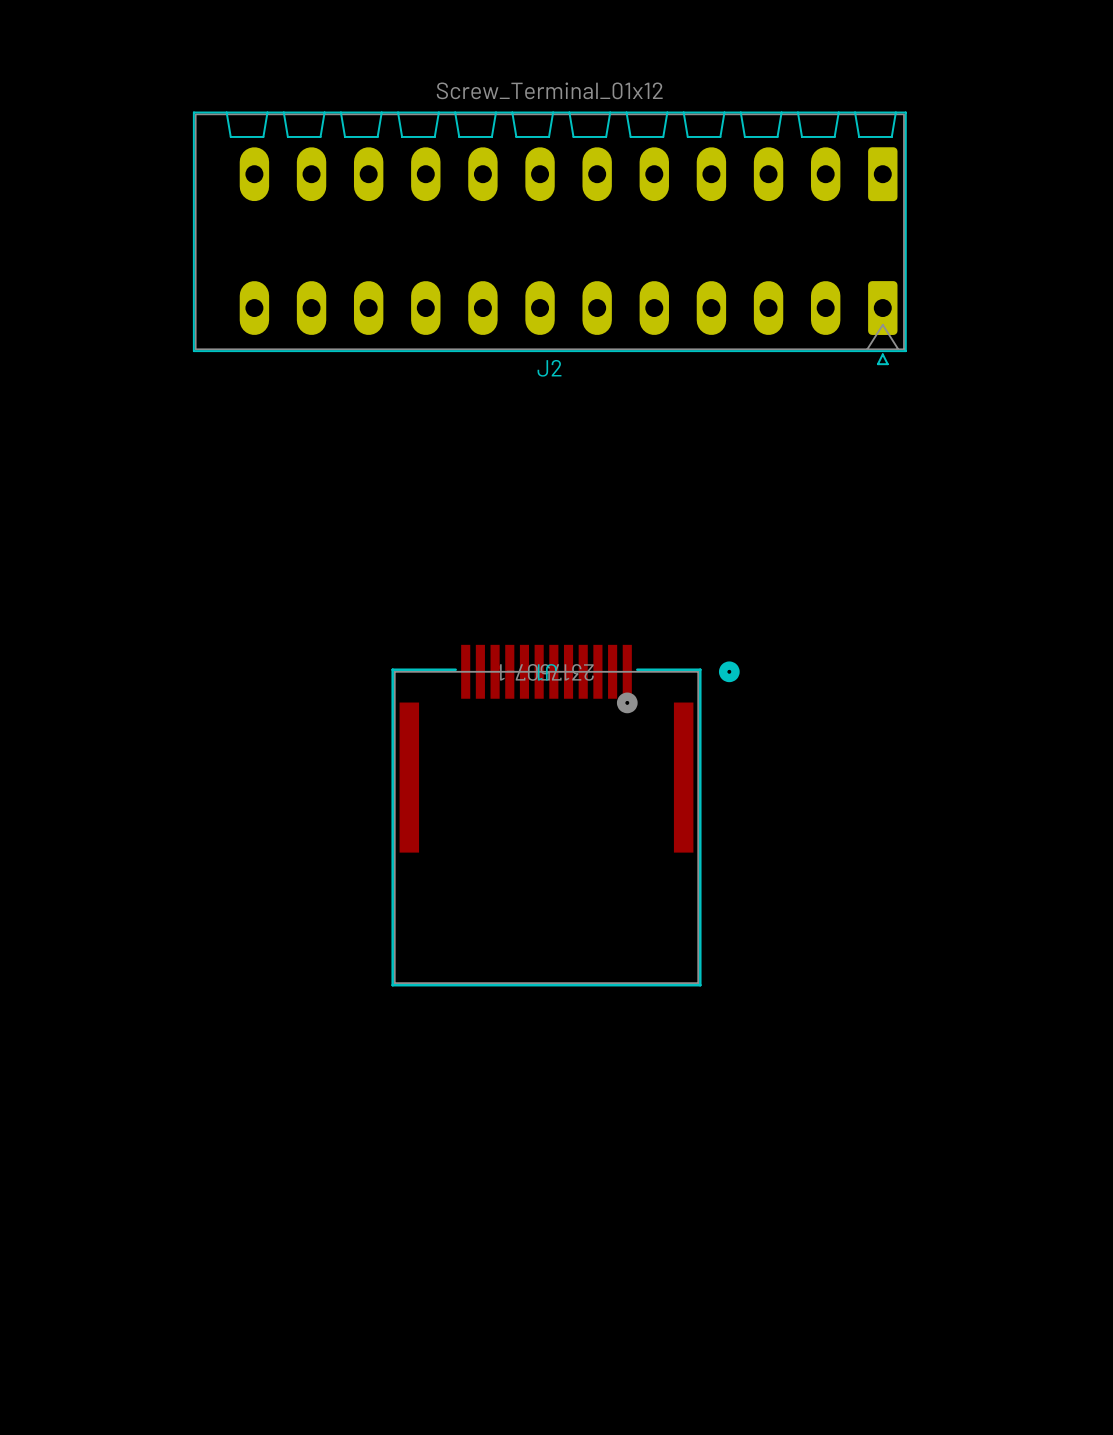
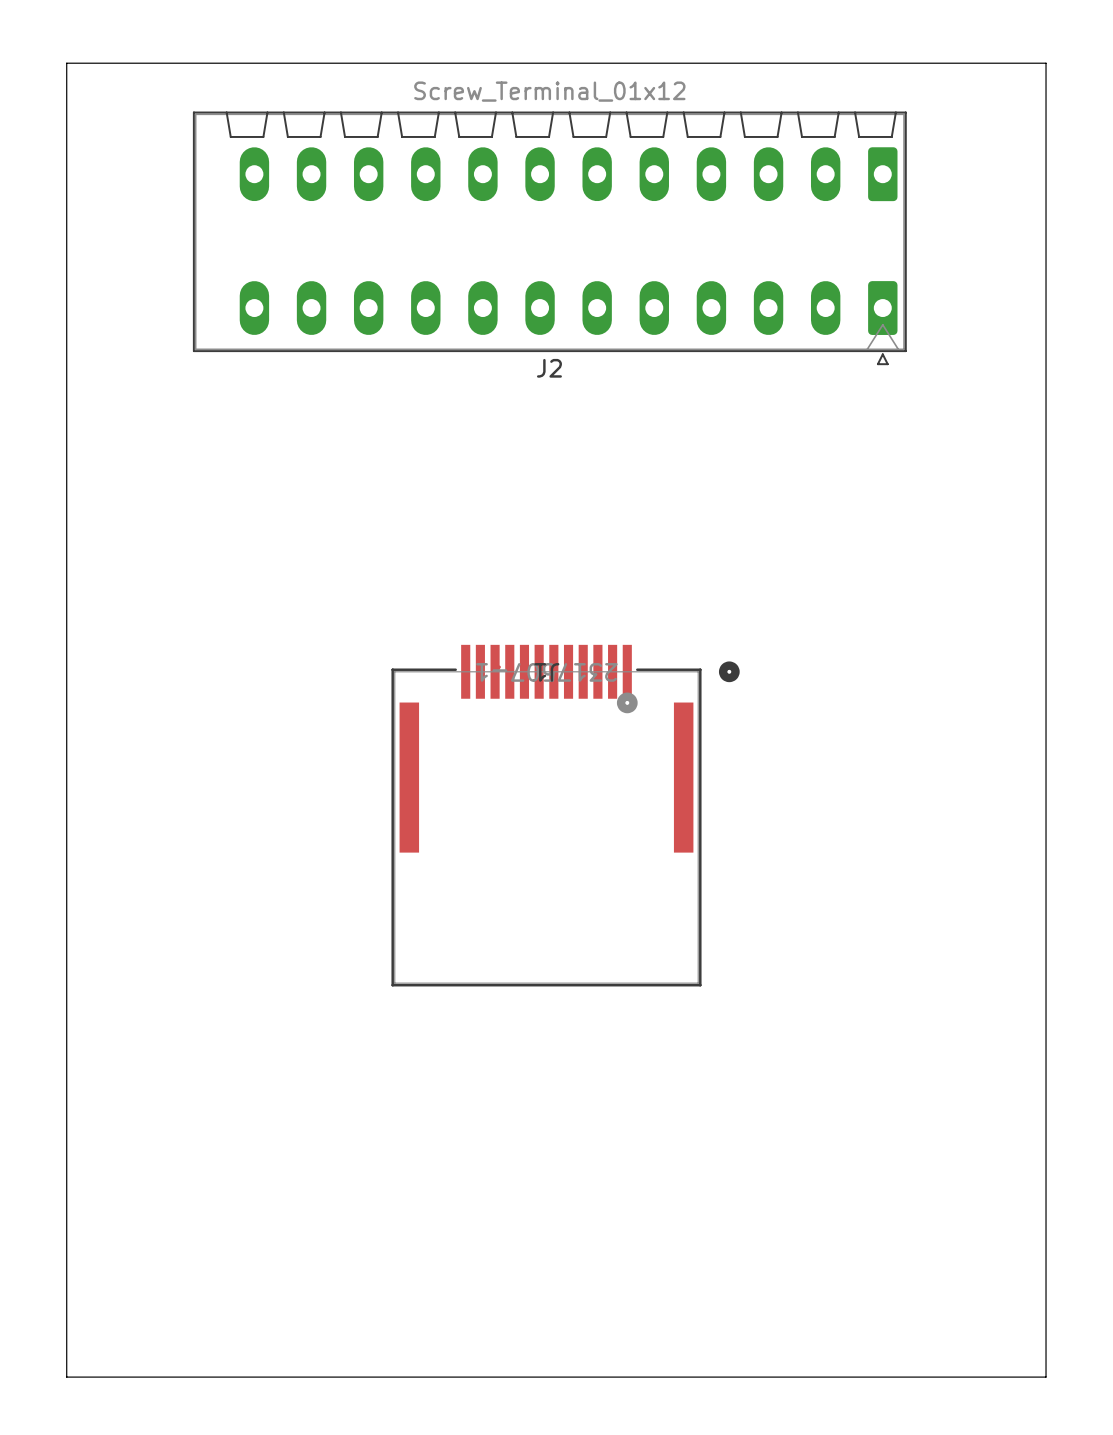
board edge: none -> (66, 63) (1046, 63) (1046, 1377) (66, 1377) (66, 63)

